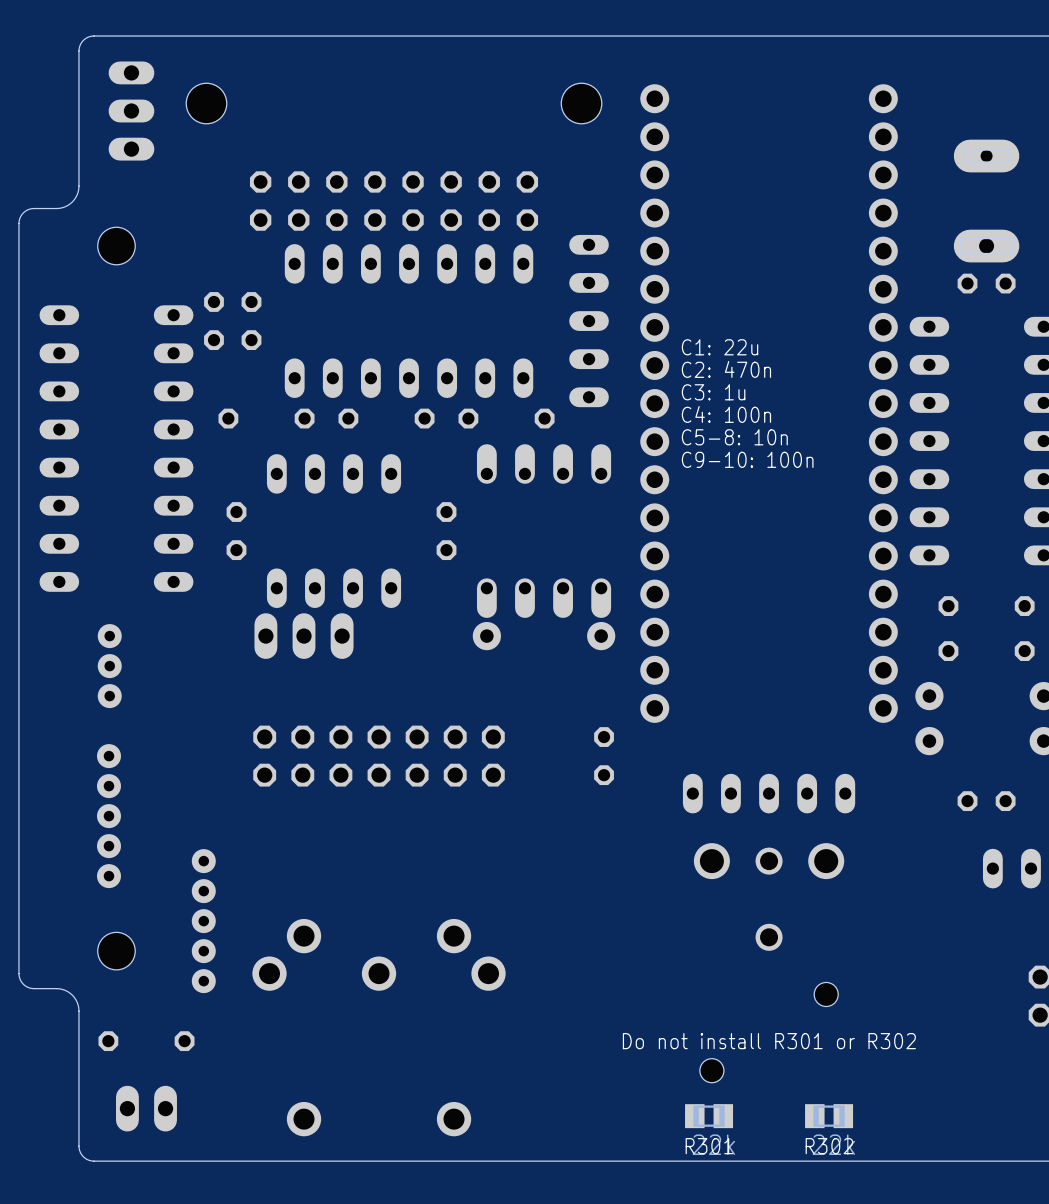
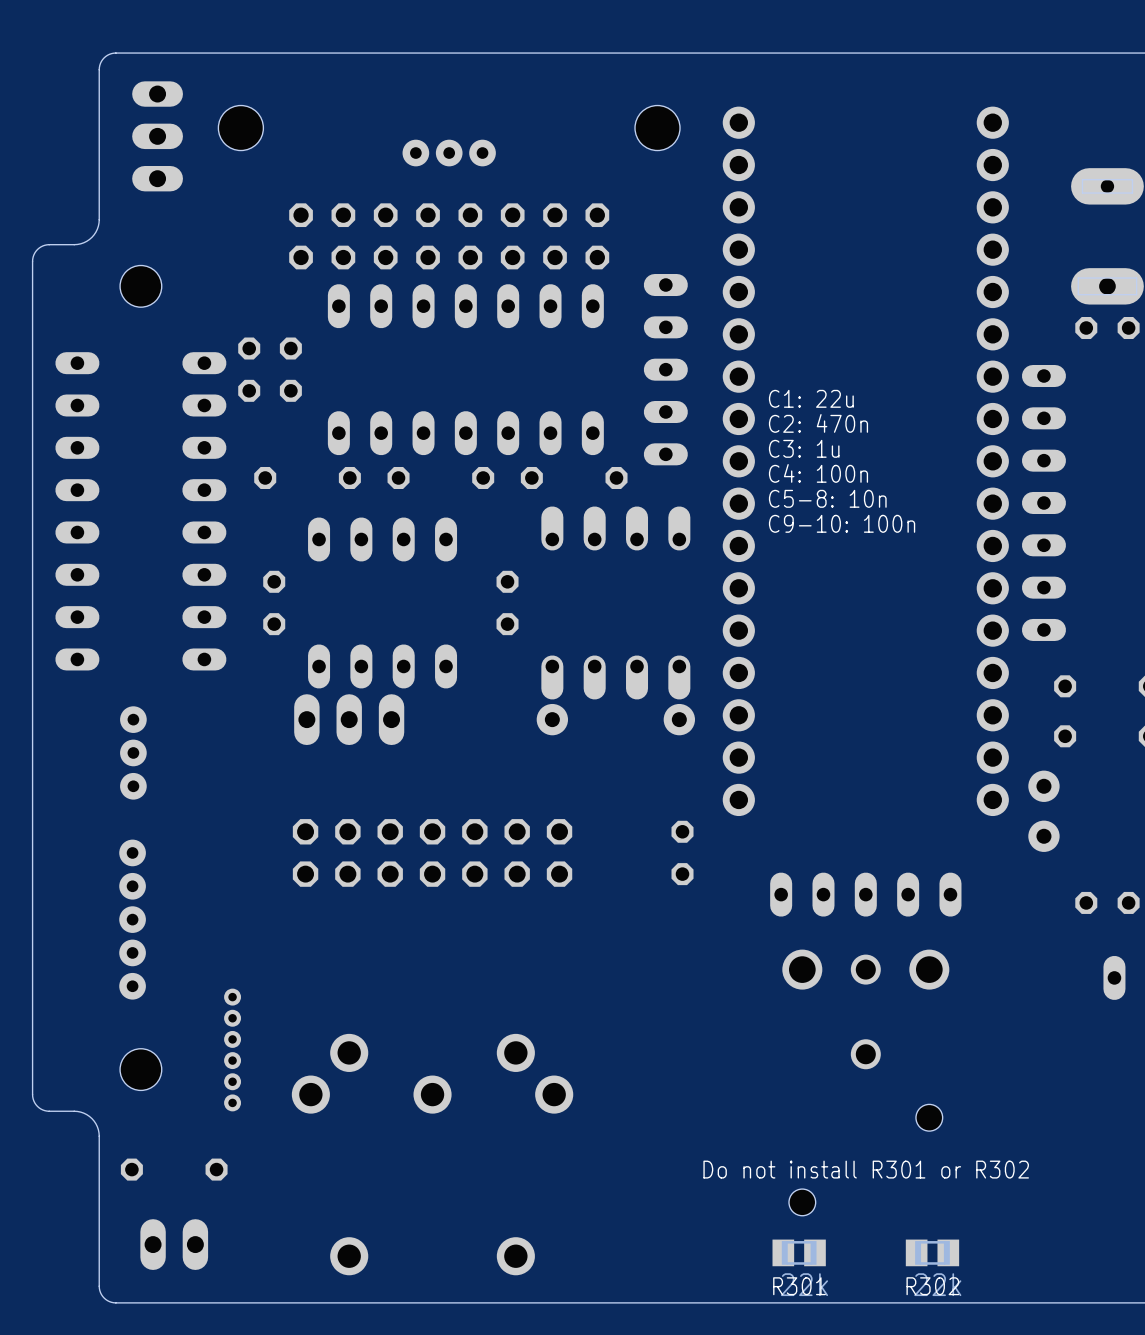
part: none -> (449, 153)
part footprint: [191, 849, 216, 994] -> [224, 988, 242, 1112]

